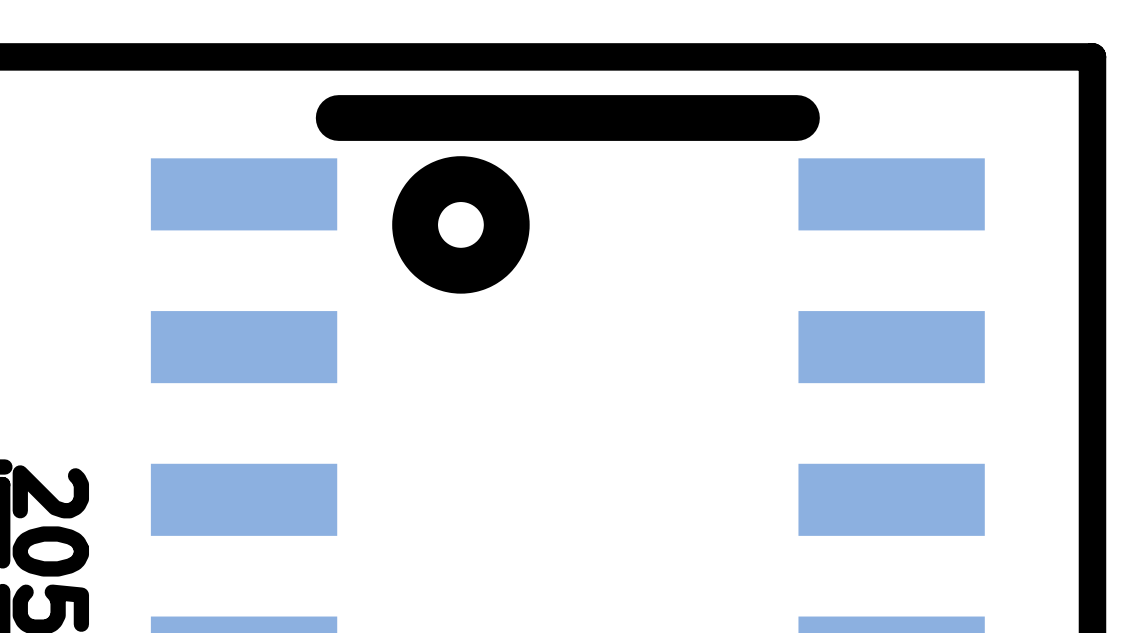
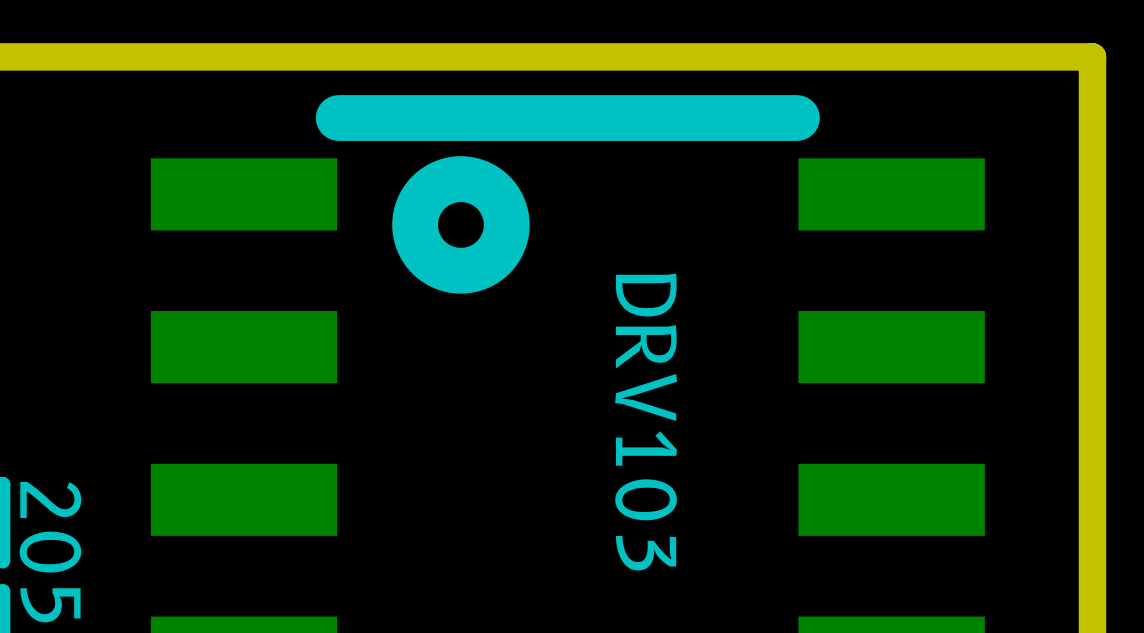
part value: none -> DRV103 (646, 422)

